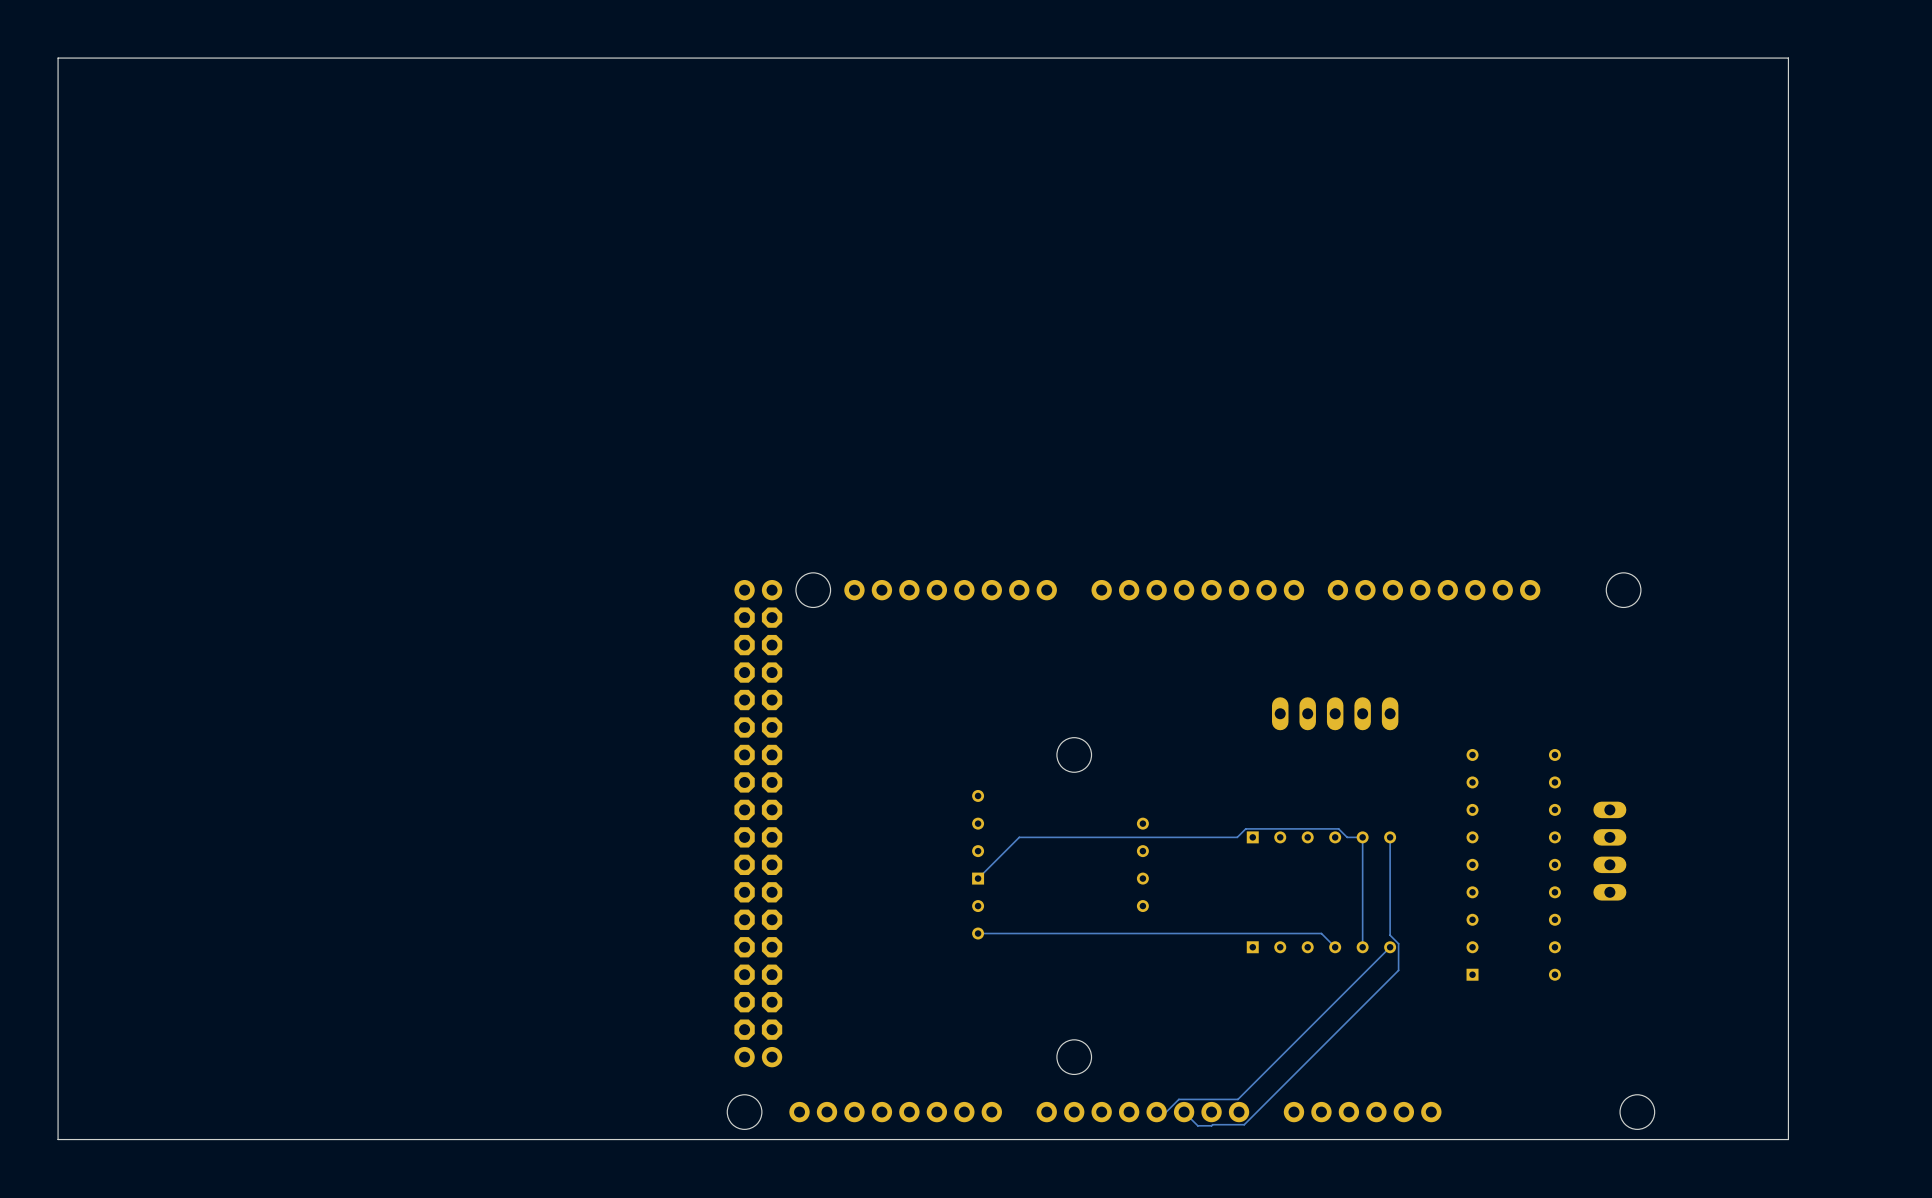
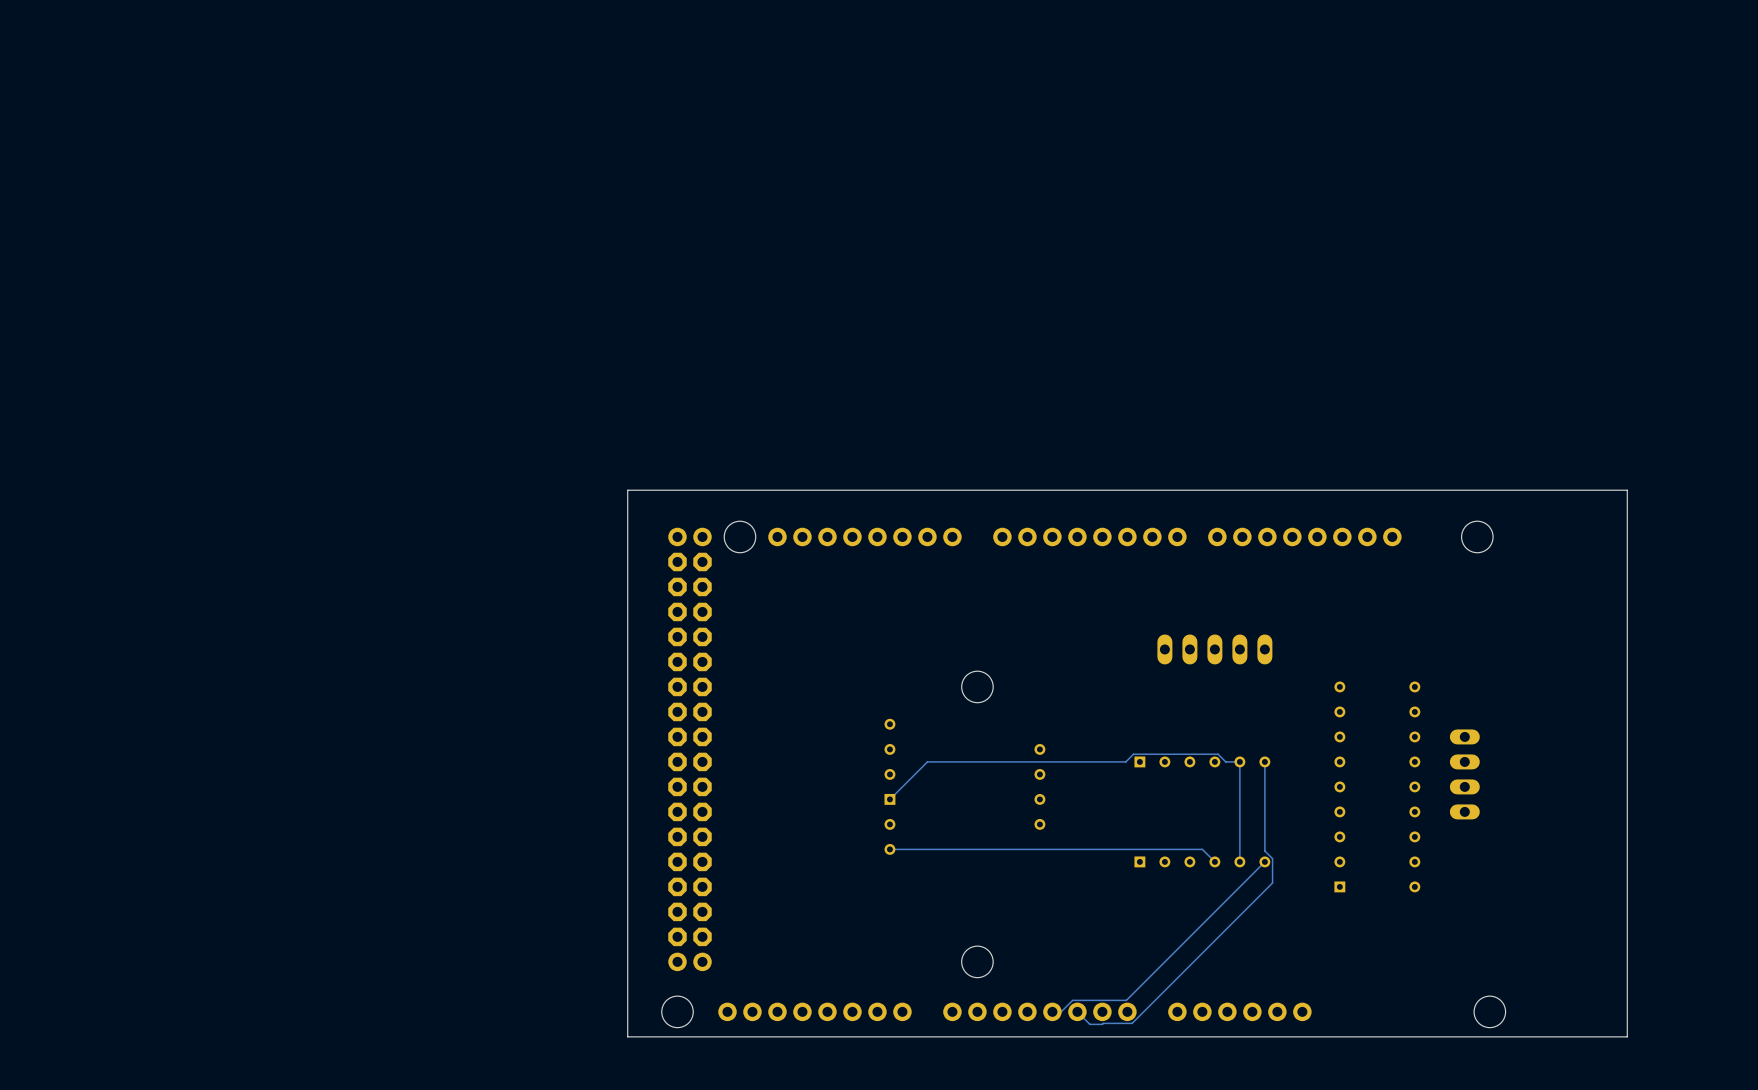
board edge: (1788, 538) (1788, 58) (58, 58) (58, 1139) (689, 1139) -> (1627, 490) (627, 490) (627, 1036)

